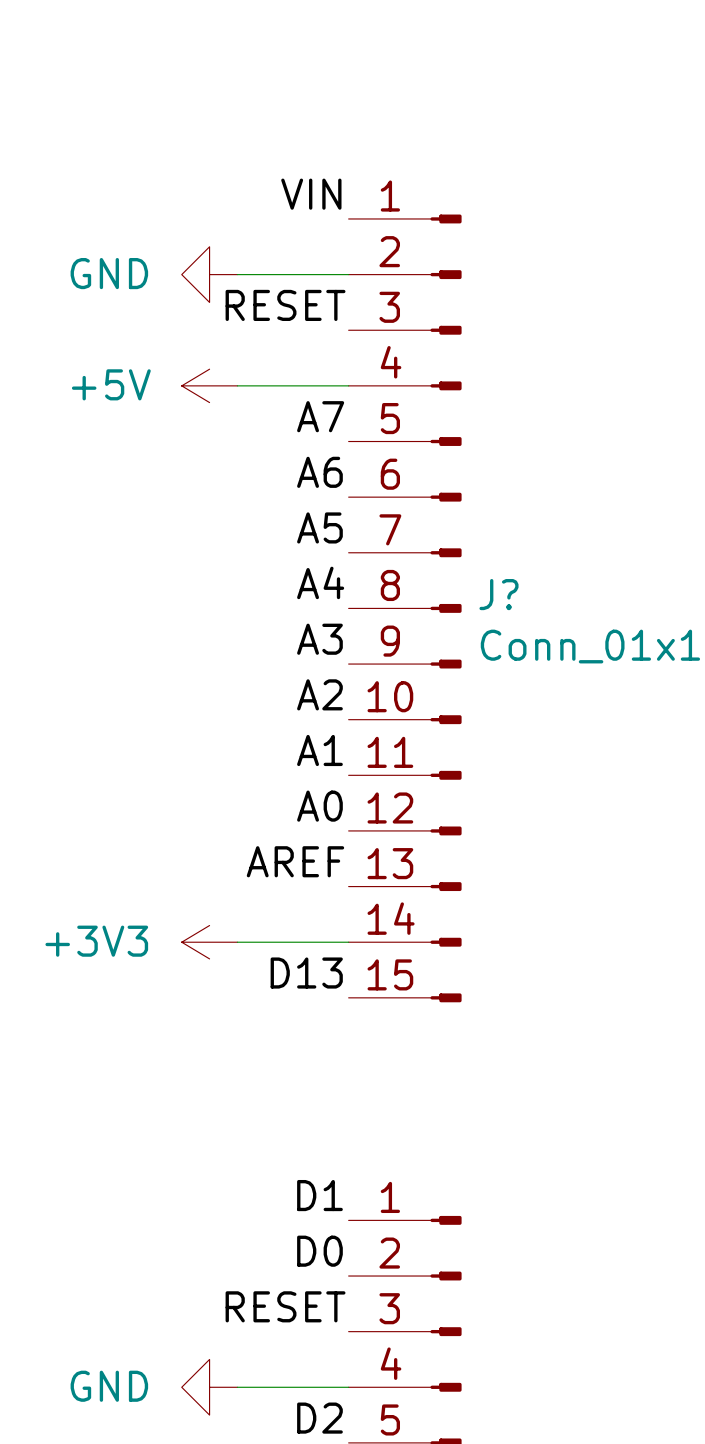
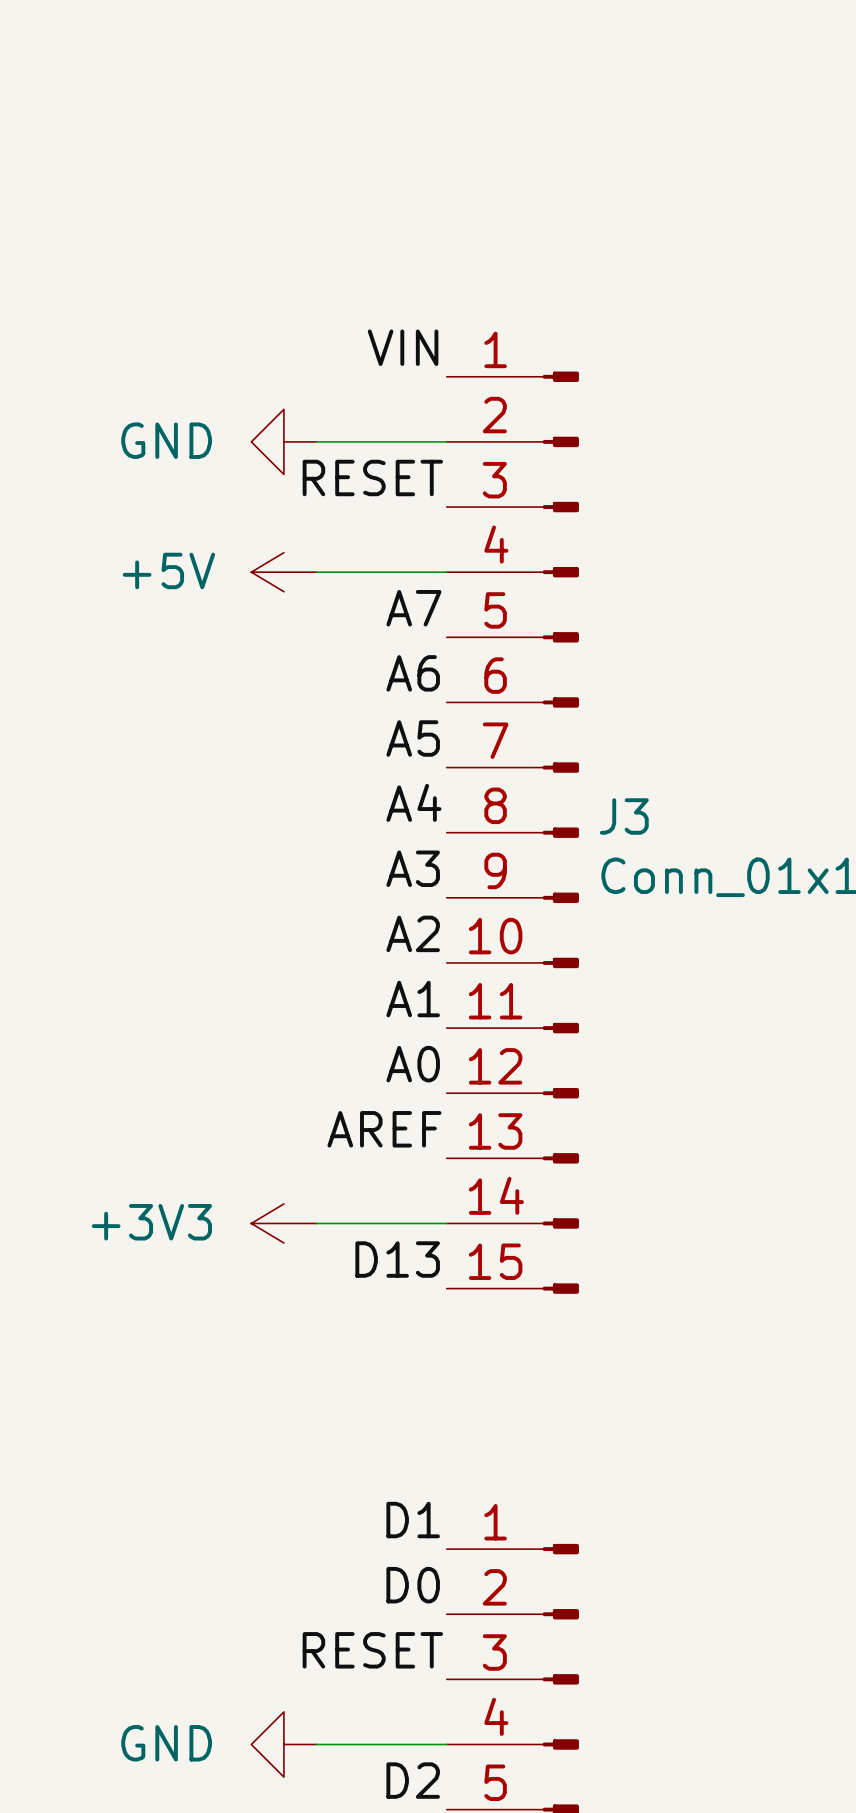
J? name: J? (499, 594) -> J3 (624, 816)

